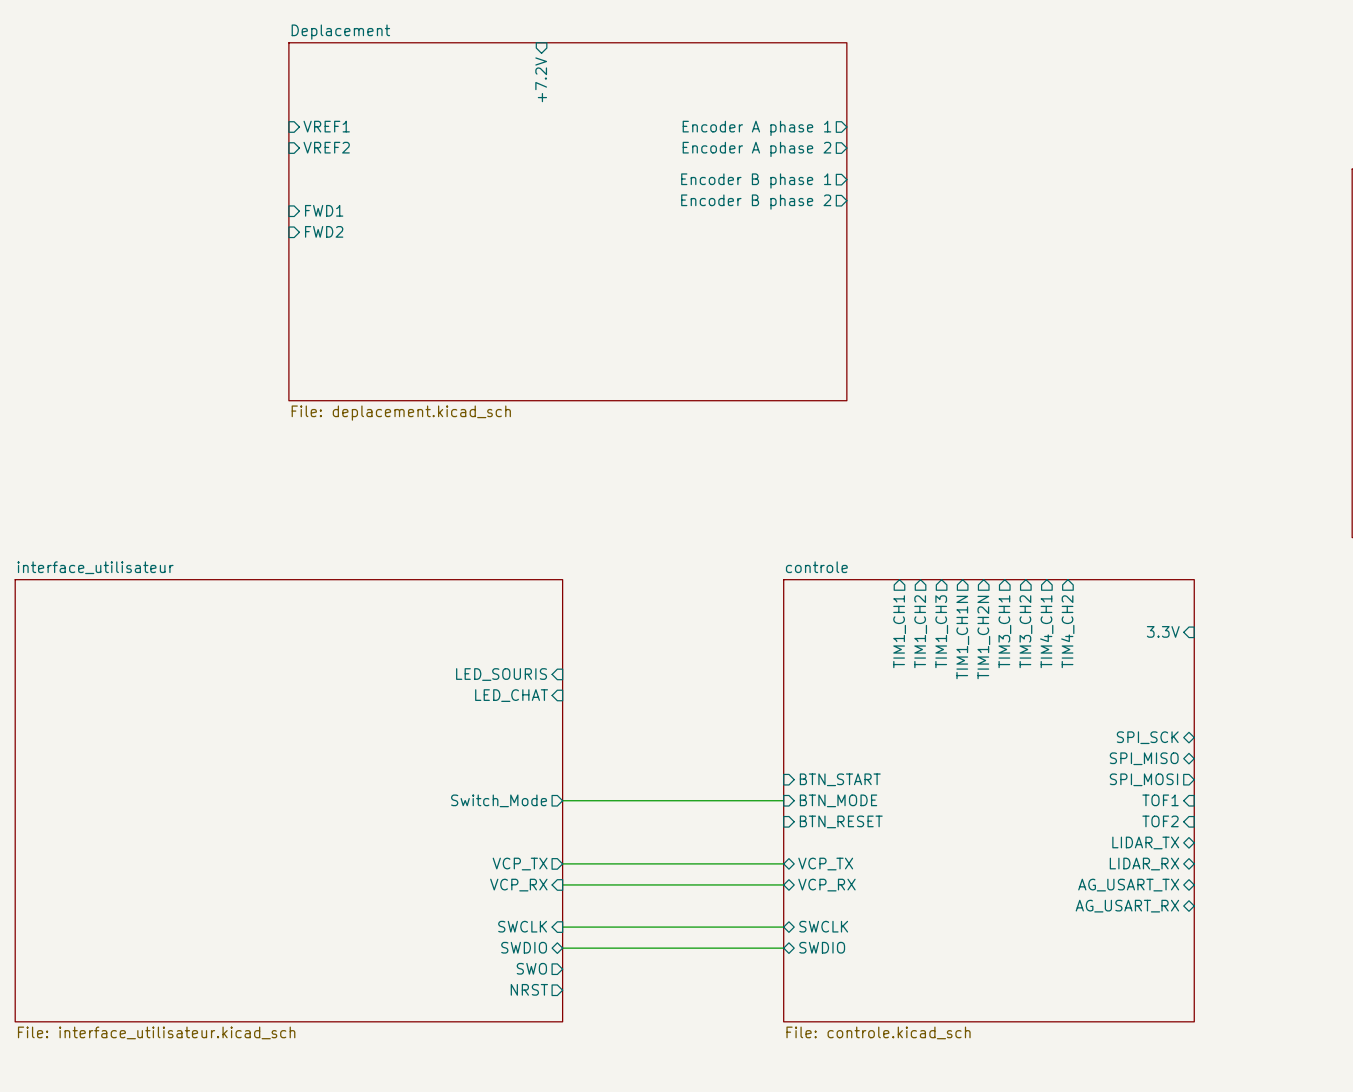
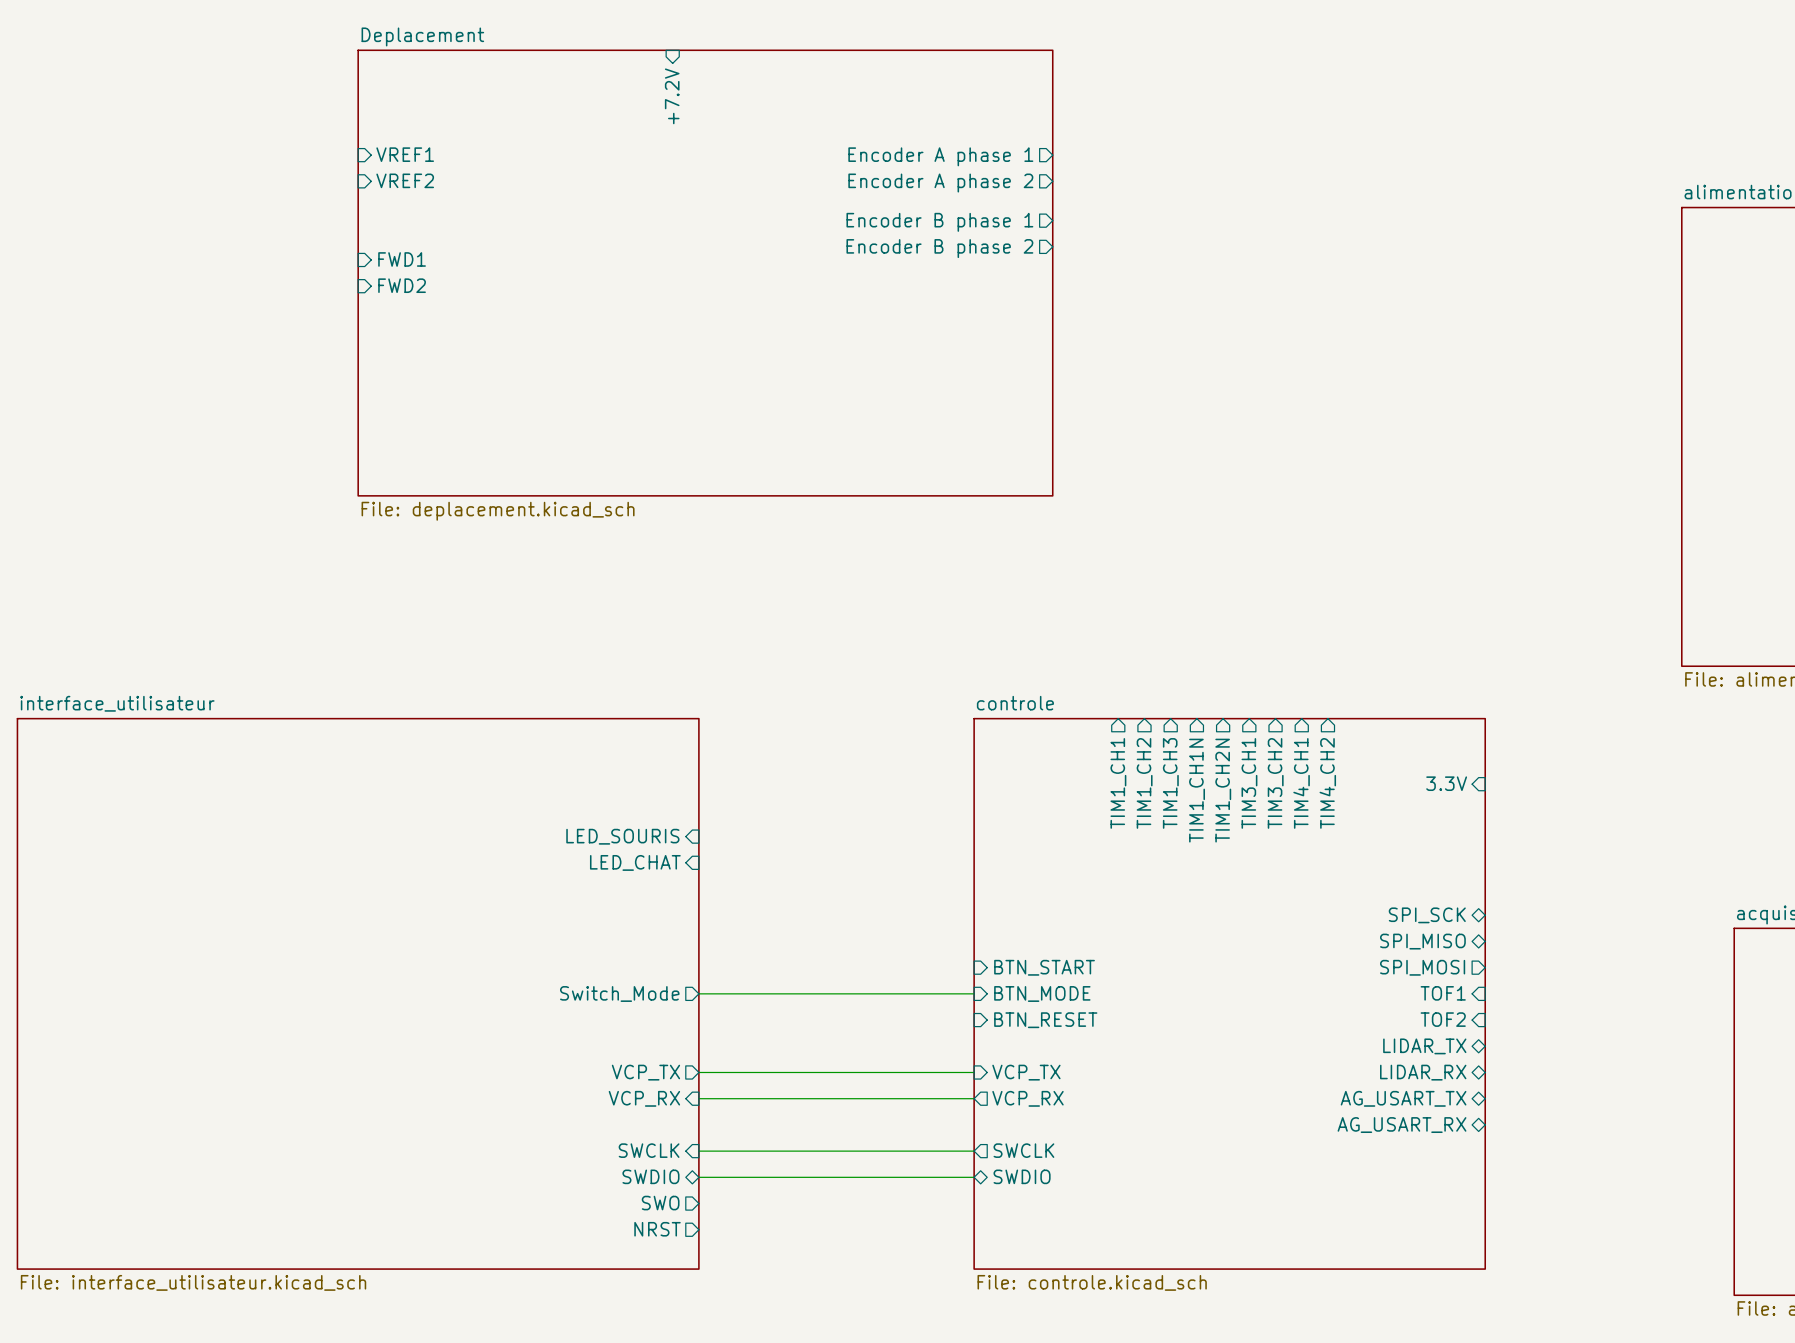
sheet pin shape: bidirectional (825, 864) -> input (1026, 1072)
sheet pin shape: bidirectional (826, 885) -> output (1027, 1098)
sheet pin shape: bidirectional (823, 926) -> output (1023, 1150)

